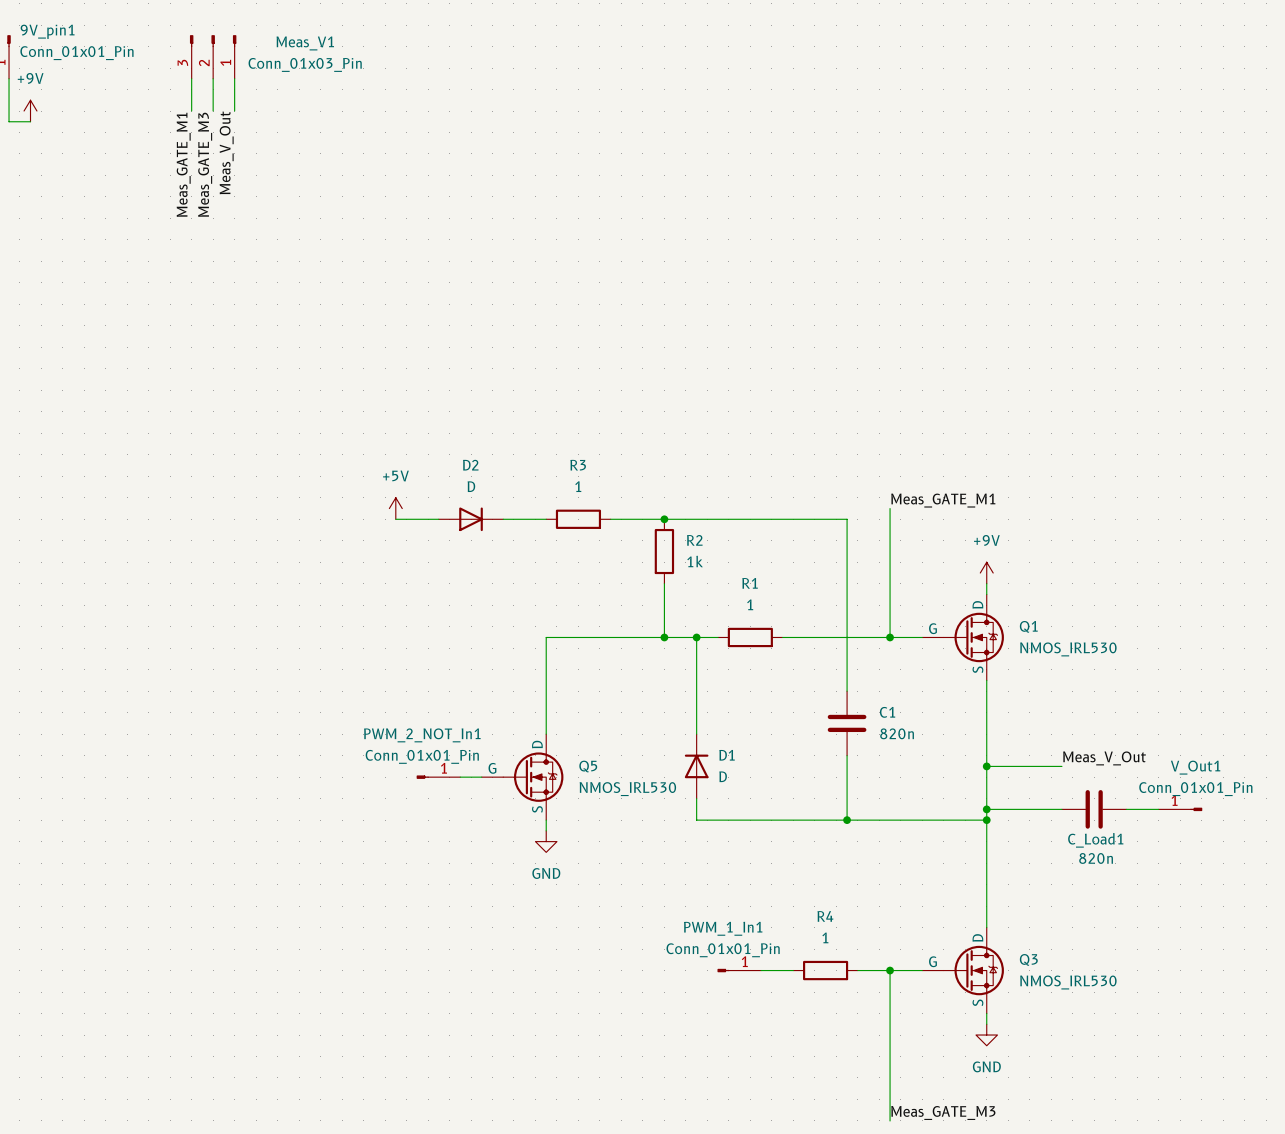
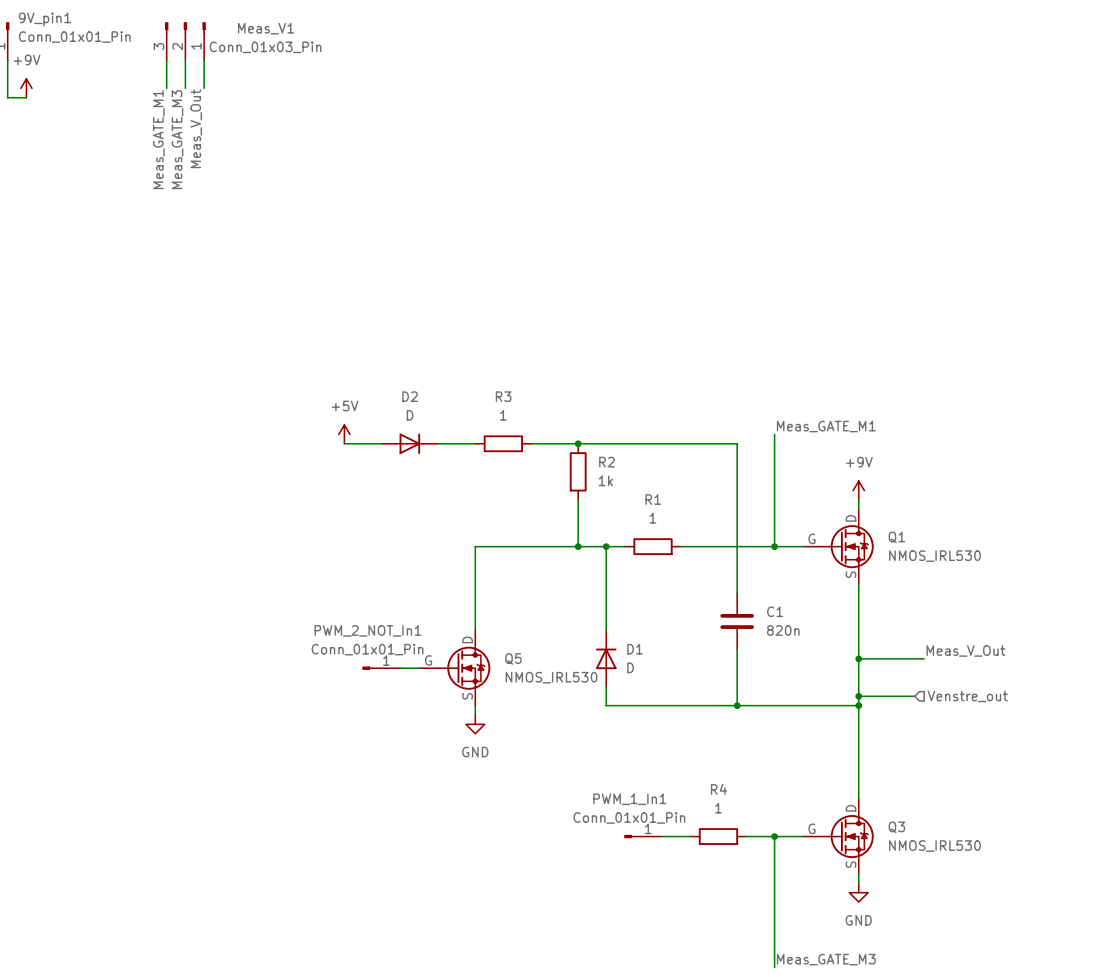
wire: (1051, 809) (1061, 809) -> none
C_Load1: 820n (1094, 809) -> none
wire: (1126, 809) (1158, 809) -> none
V_Out1: Conn_01x01_Pin (1180, 809) -> none
hierarchical label: none -> Venstre_out (967, 696)

